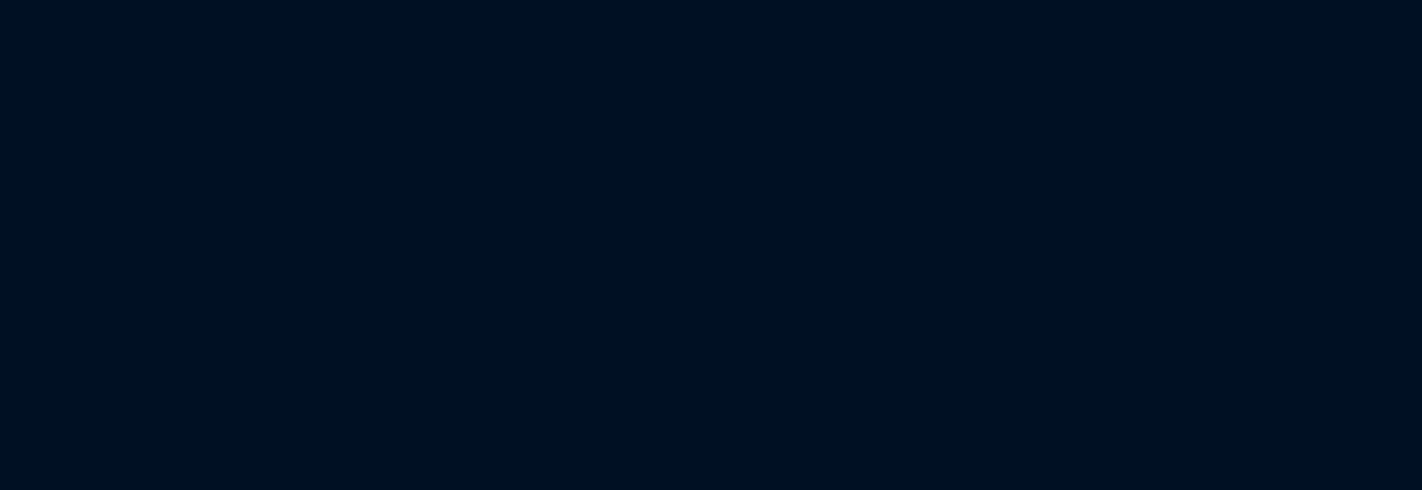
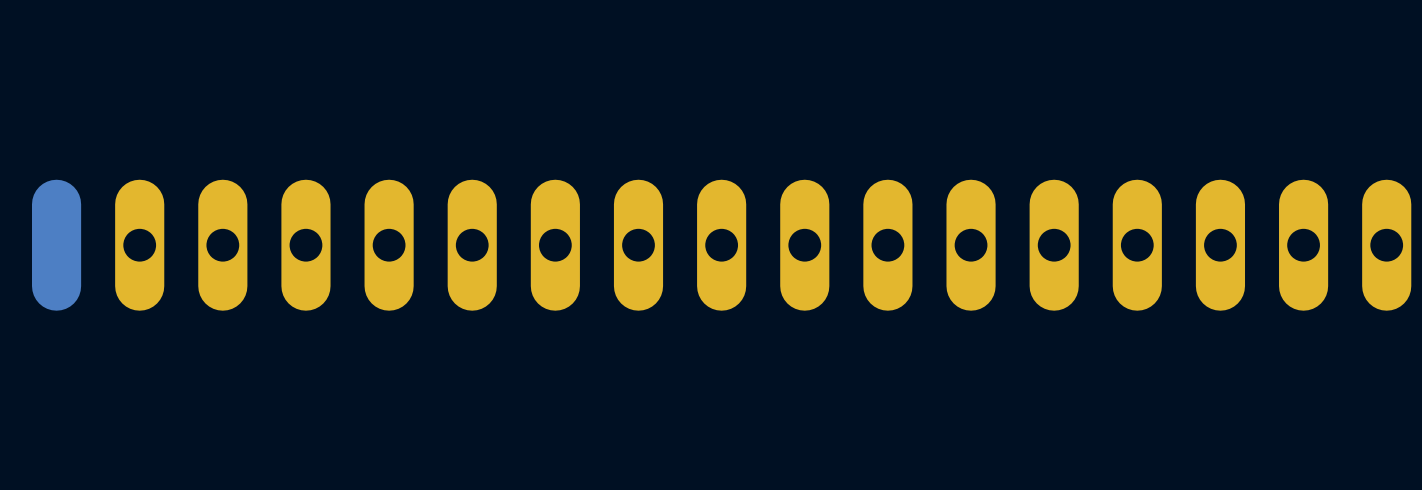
part: none -> (721, 245)

